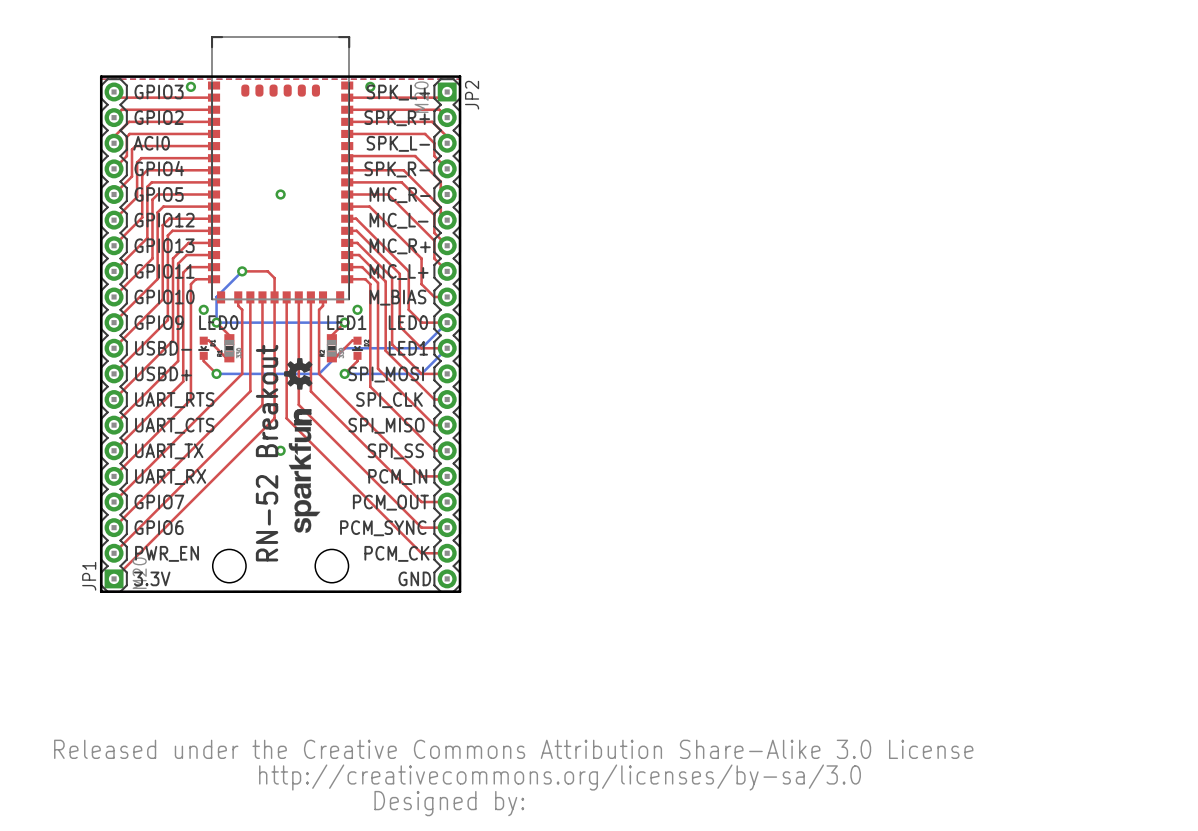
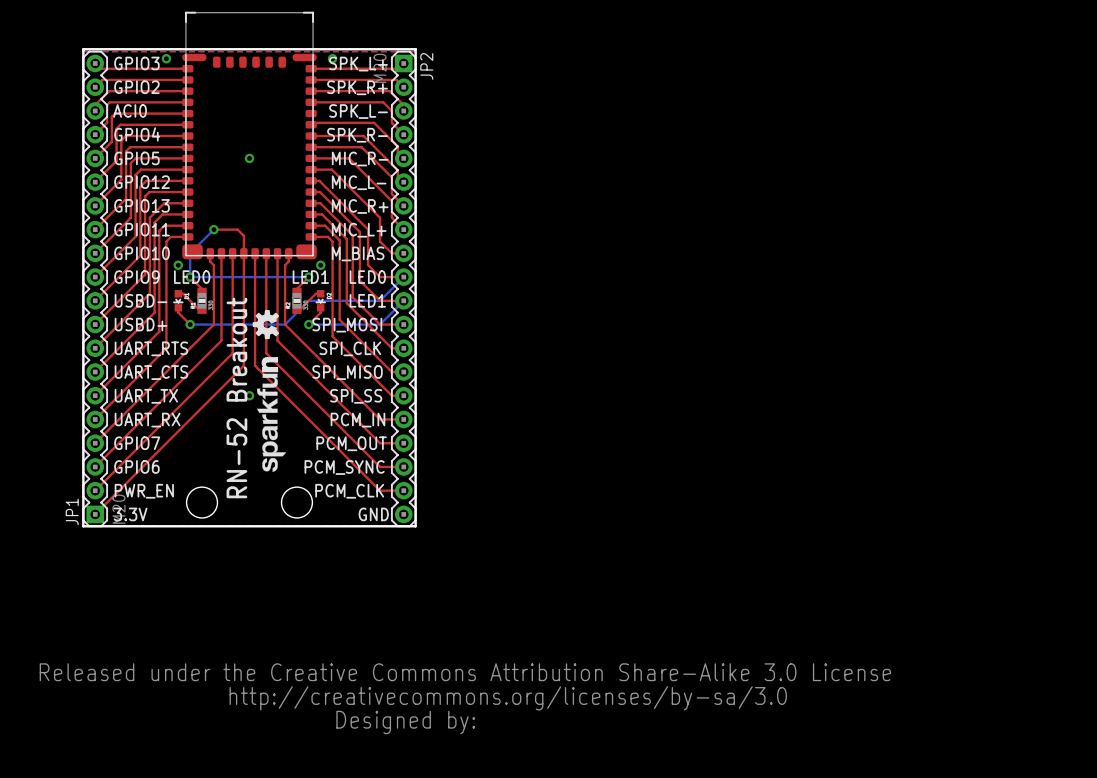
part footprint: [207, 36, 354, 304] -> [182, 11, 317, 260]
text: PCM_CK (396, 553) -> PCM_CLK (349, 491)

